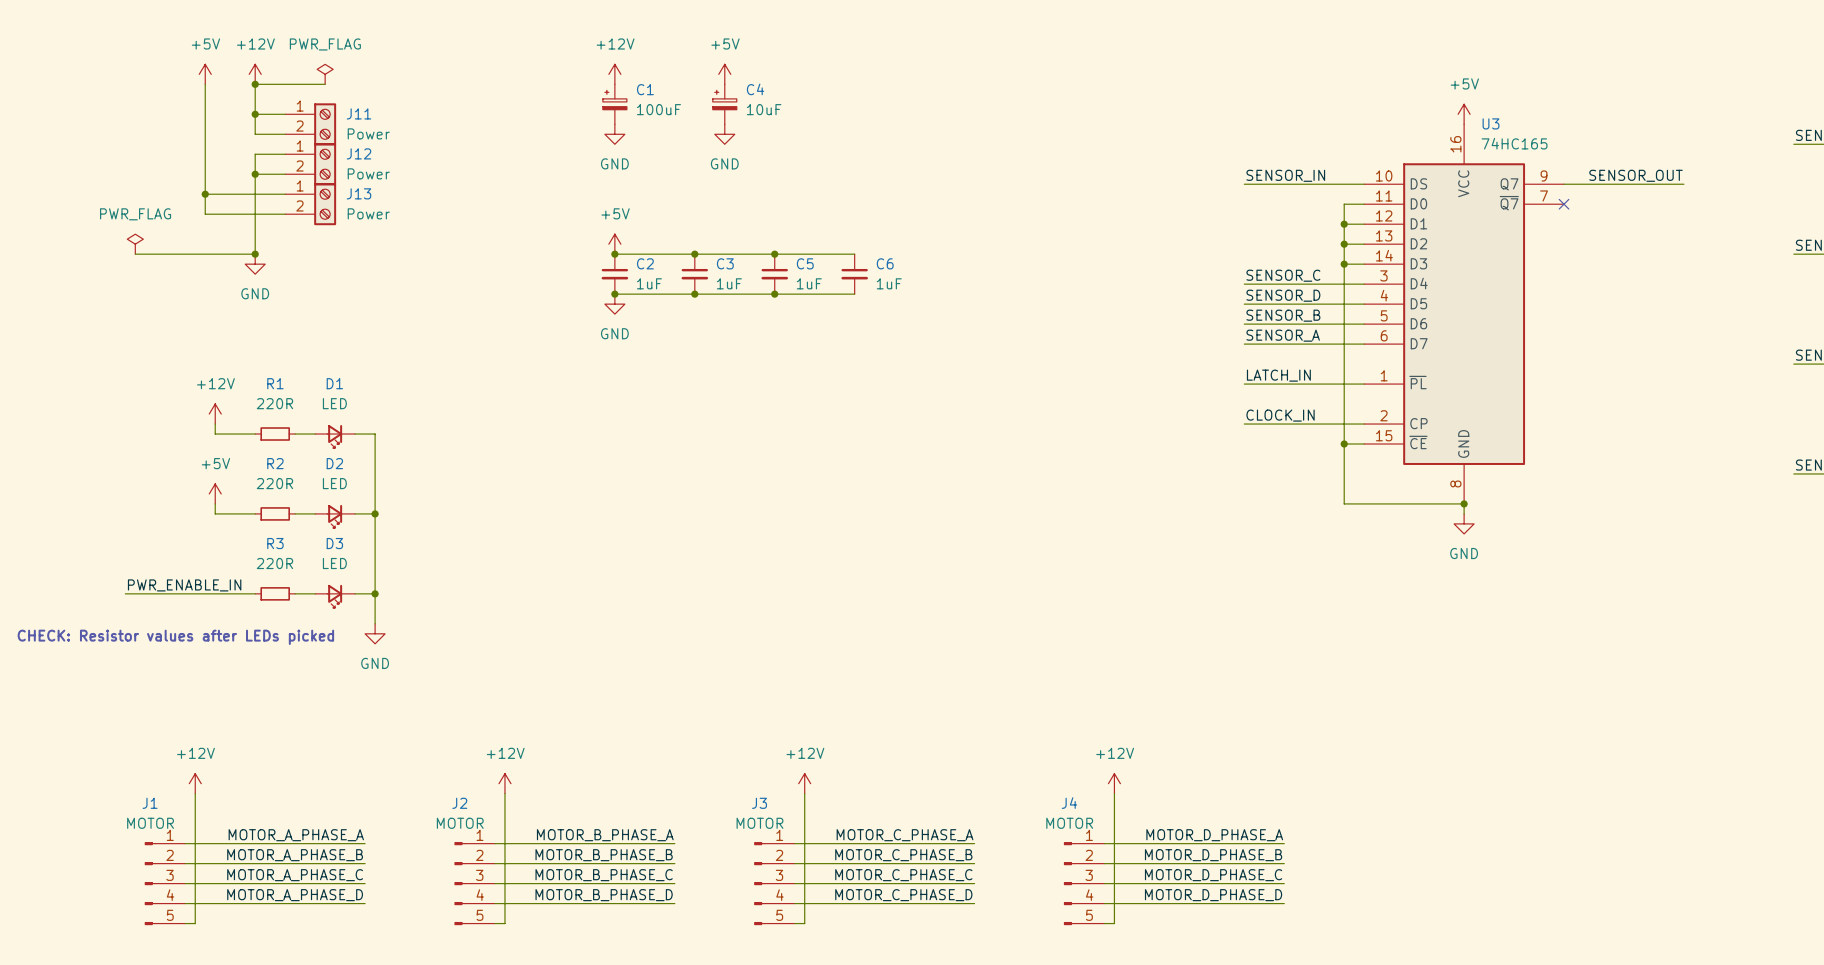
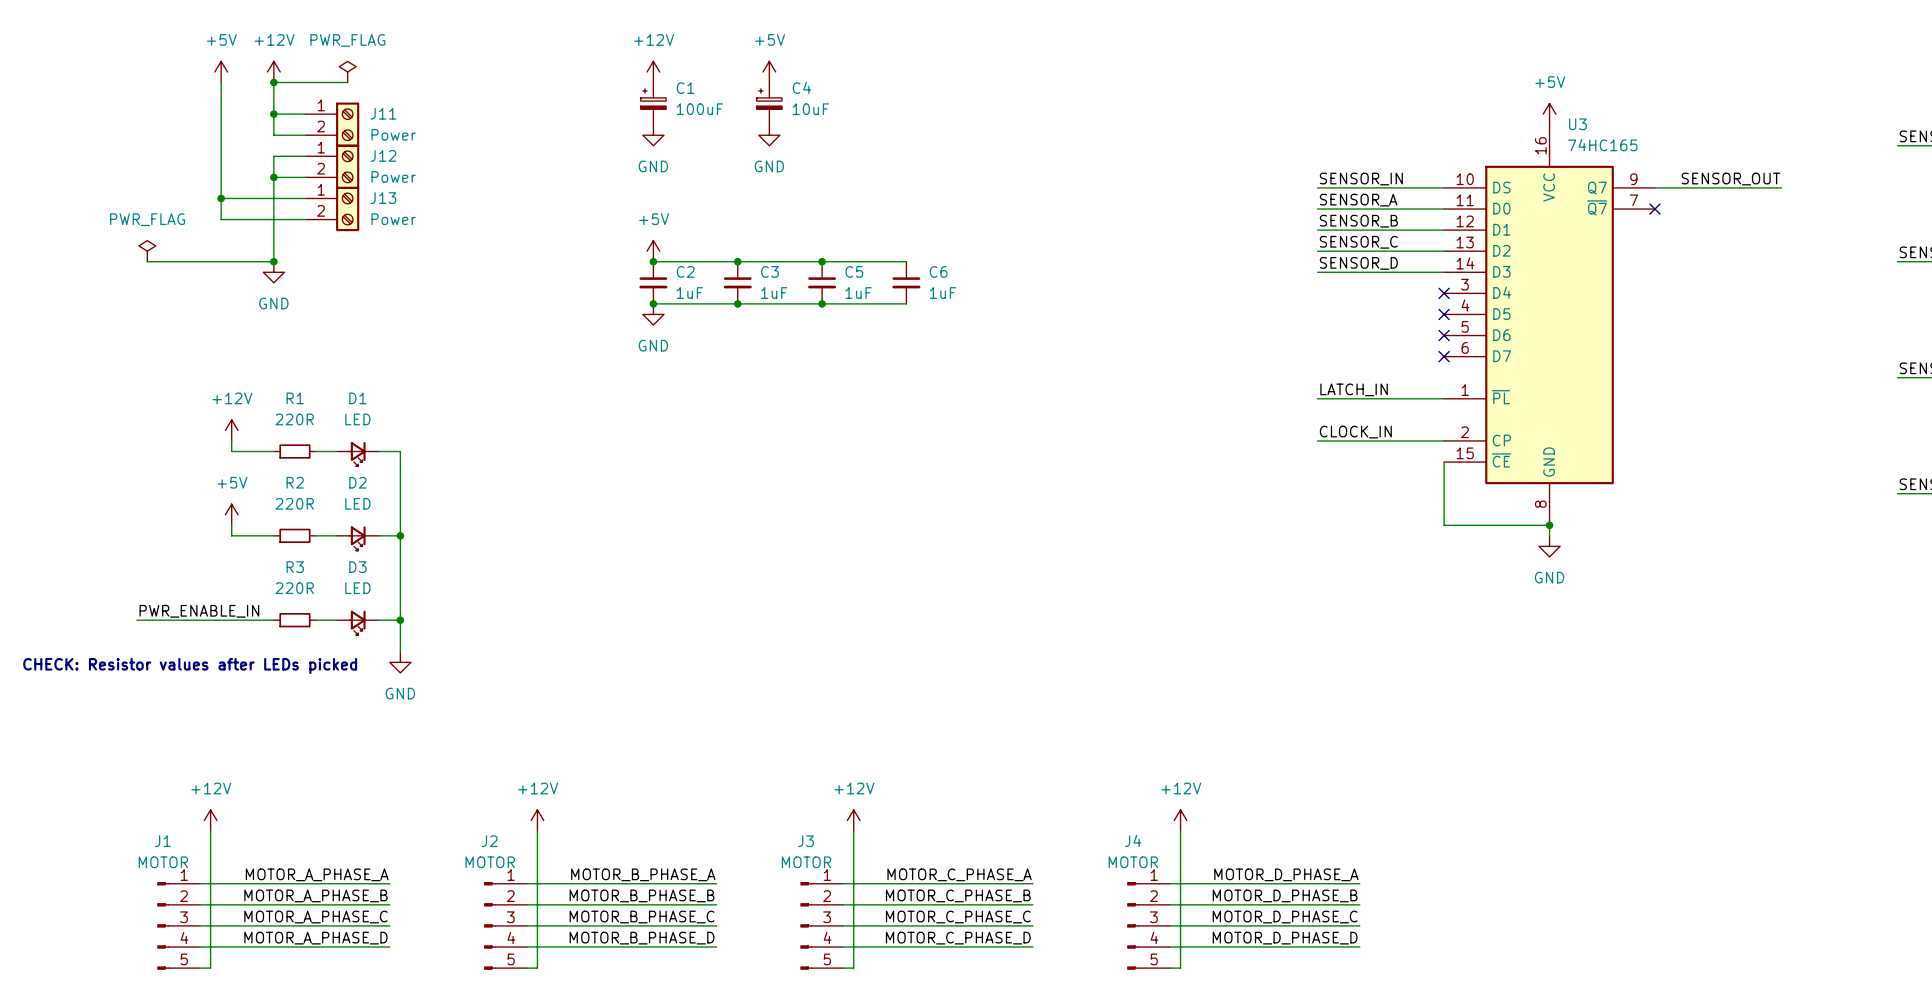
wire: (1344, 204) (1344, 503) (1364, 503) -> (1423, 209) (1317, 209)
wire: none -> (1317, 230) (1423, 230)
junction: (1344, 224) -> none
wire: none -> (1317, 251) (1423, 251)
junction: (1344, 244) -> none
wire: none -> (1317, 272) (1423, 272)
junction: (1344, 264) -> none
label position: SENSOR_C (1283, 275) -> SENSOR_C (1358, 242)
wire: (1244, 284) (1364, 284) -> none
no-connect mark: none -> (1444, 293)
label position: SENSOR_D (1283, 295) -> SENSOR_D (1358, 263)
wire: (1244, 304) (1364, 304) -> none
no-connect mark: none -> (1444, 314)
label position: SENSOR_B (1283, 315) -> SENSOR_B (1358, 221)
wire: (1244, 324) (1364, 324) -> none
no-connect mark: none -> (1444, 335)
label position: SENSOR_A (1283, 335) -> SENSOR_A (1358, 200)
wire: (1244, 344) (1364, 344) -> none
no-connect mark: none -> (1444, 356)
wire: (1344, 444) (1364, 444) -> (1444, 525) (1444, 462)
junction: (1344, 444) -> none

